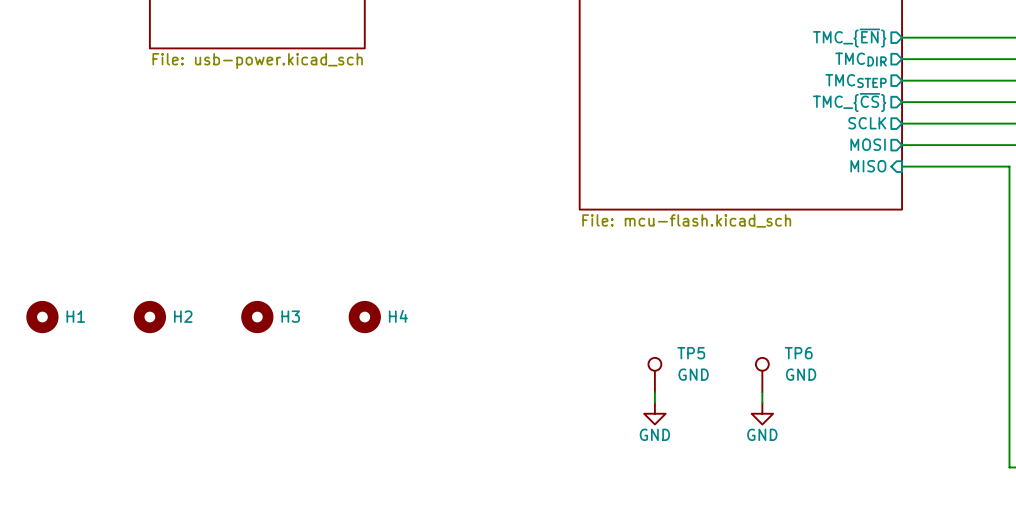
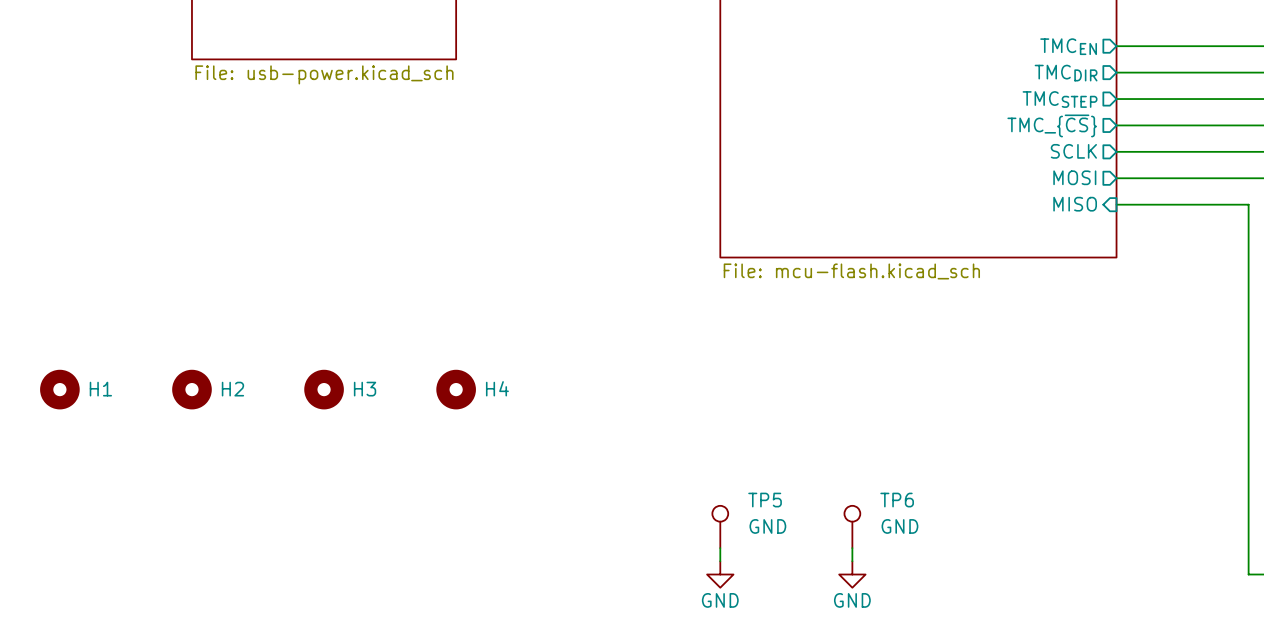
sheet pin: TMC_{~{EN}} (849, 38) -> TMCEN (1068, 46)
TP5 position: (654, 375) -> (720, 526)
TP6 position: (762, 375) -> (852, 526)
wire: (654, 392) (654, 403) -> (720, 548) (720, 561)
wire: (762, 392) (762, 403) -> (852, 548) (852, 561)
power symbol: GND (654, 413) -> none
power symbol: GND (762, 413) -> none
power symbol: none -> GND (720, 574)
power symbol: none -> GND (852, 574)

